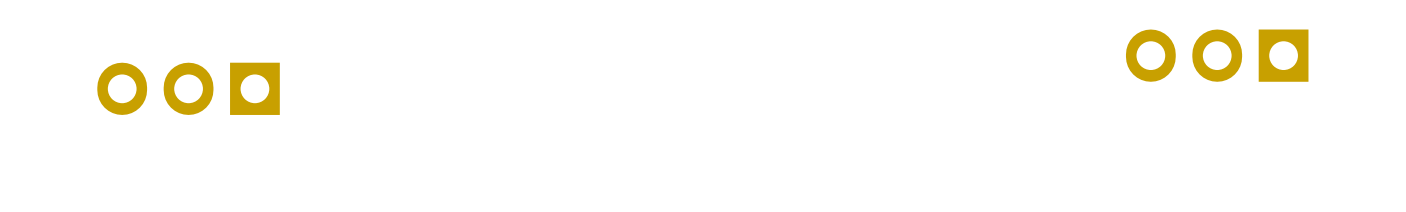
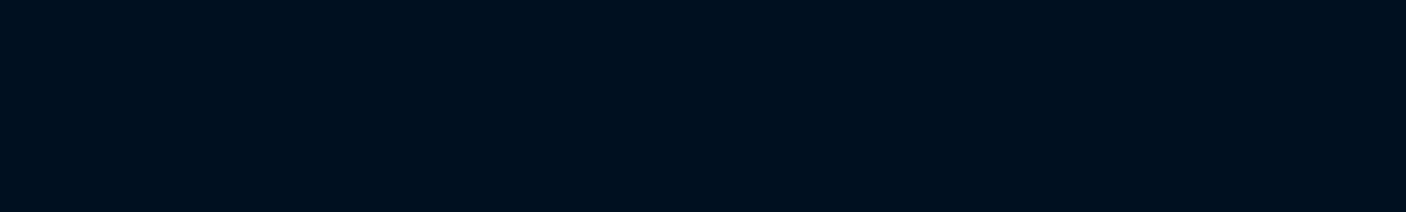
part: (1217, 55) -> none
part: (188, 88) -> none

